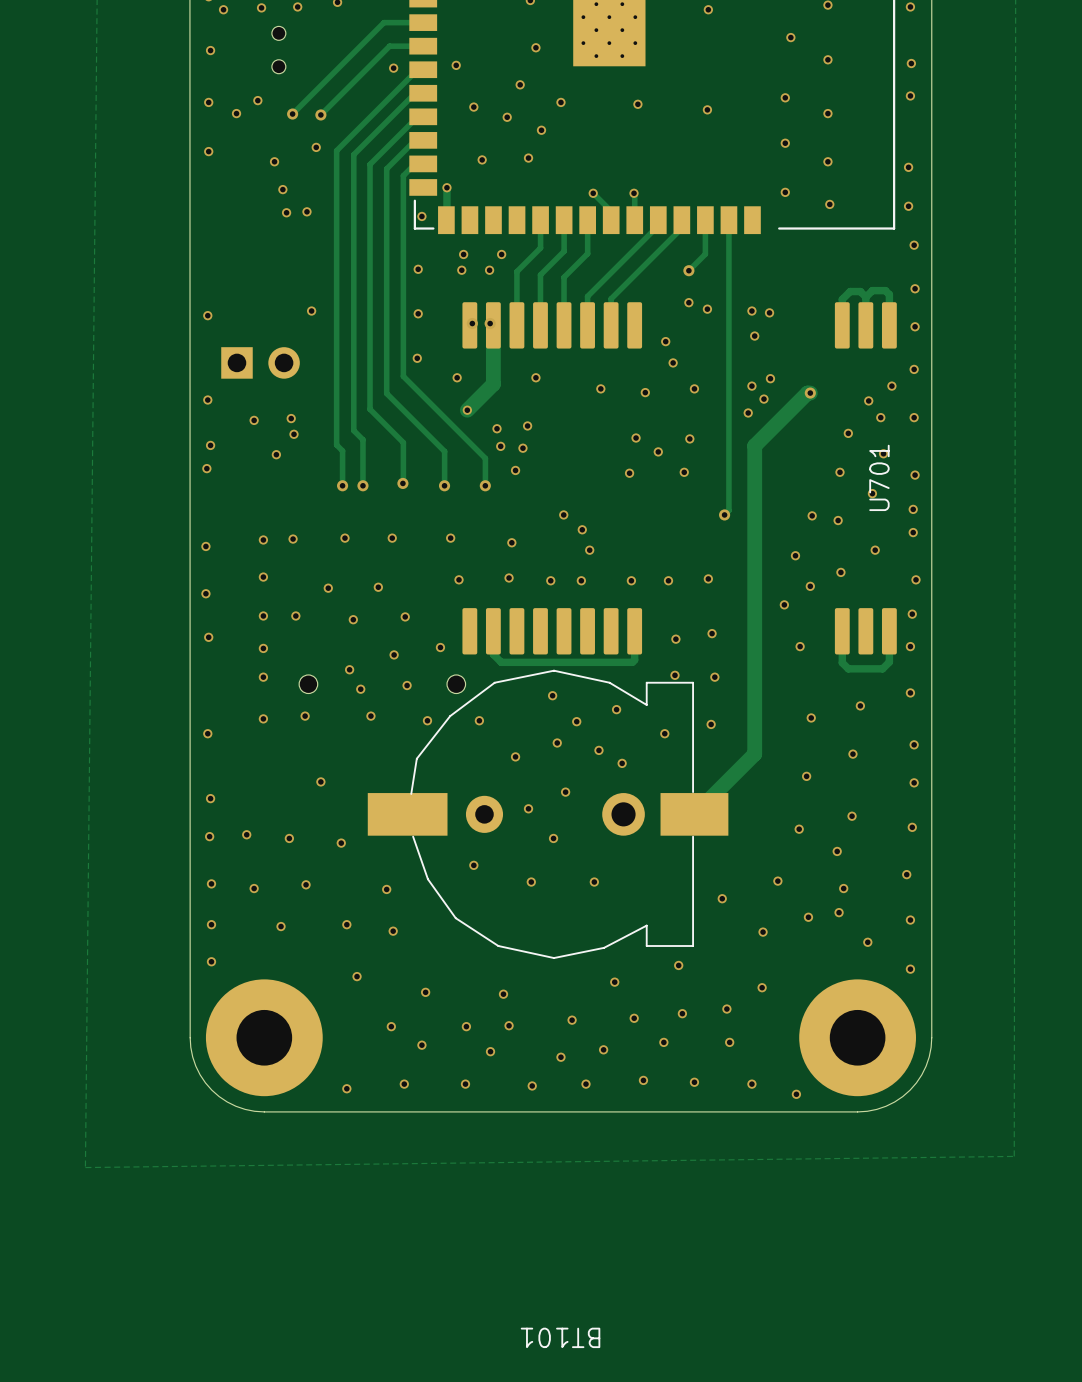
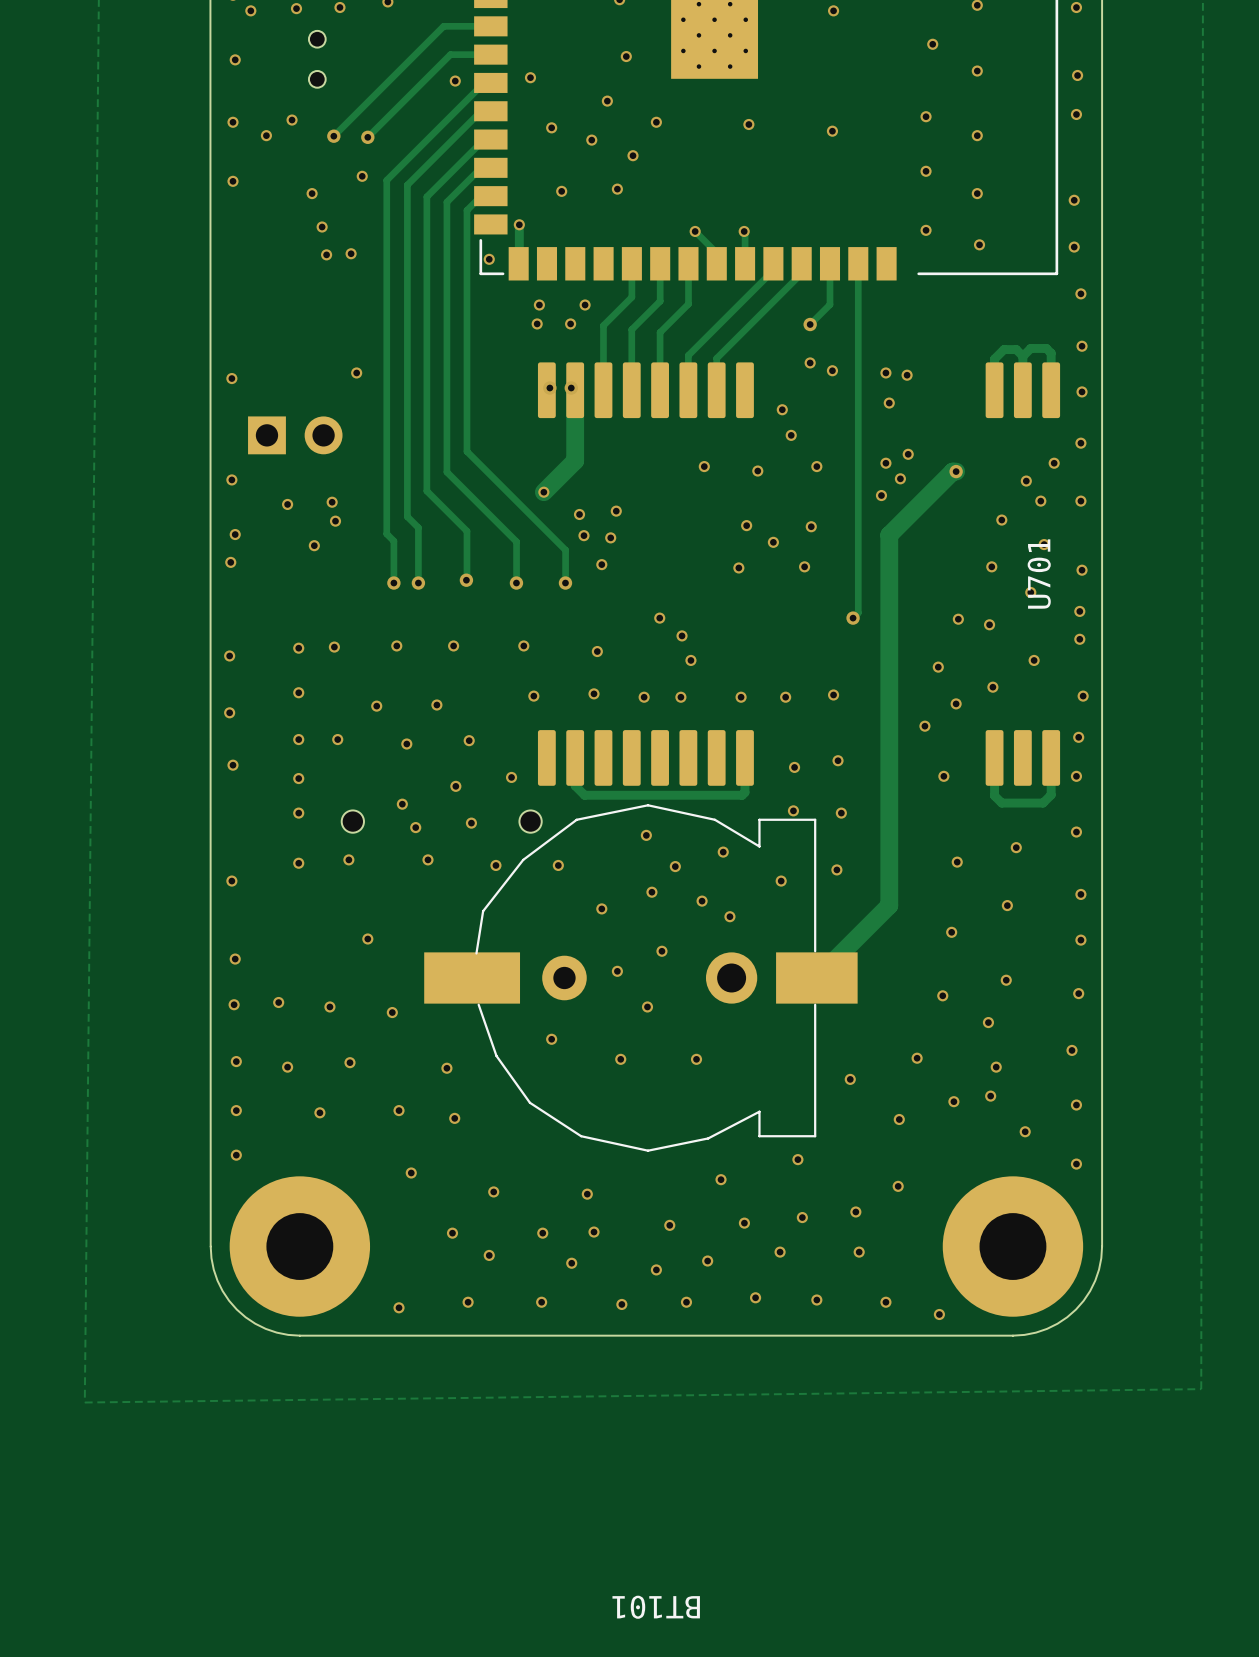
via: (418, 269) -> none
via: (418, 313) -> none
via: (417, 358) -> none
via: (457, 377) -> none
via: (535, 377) -> none

